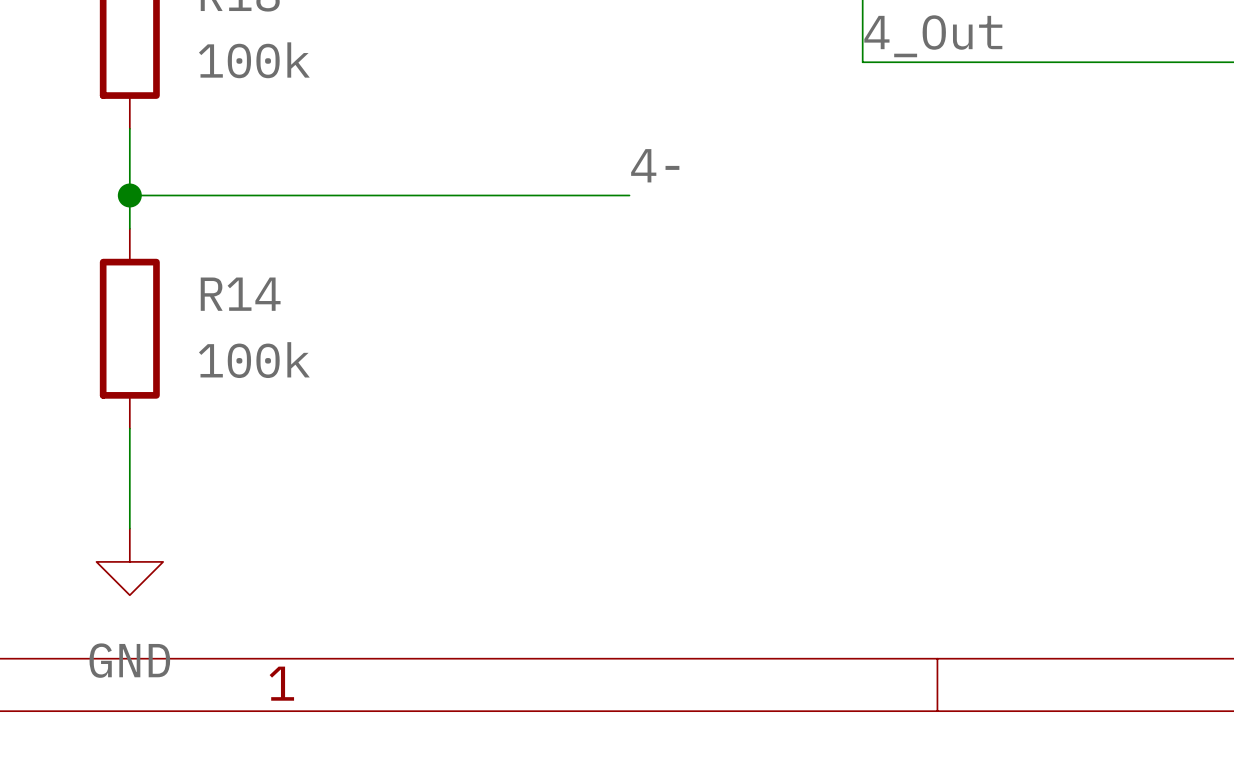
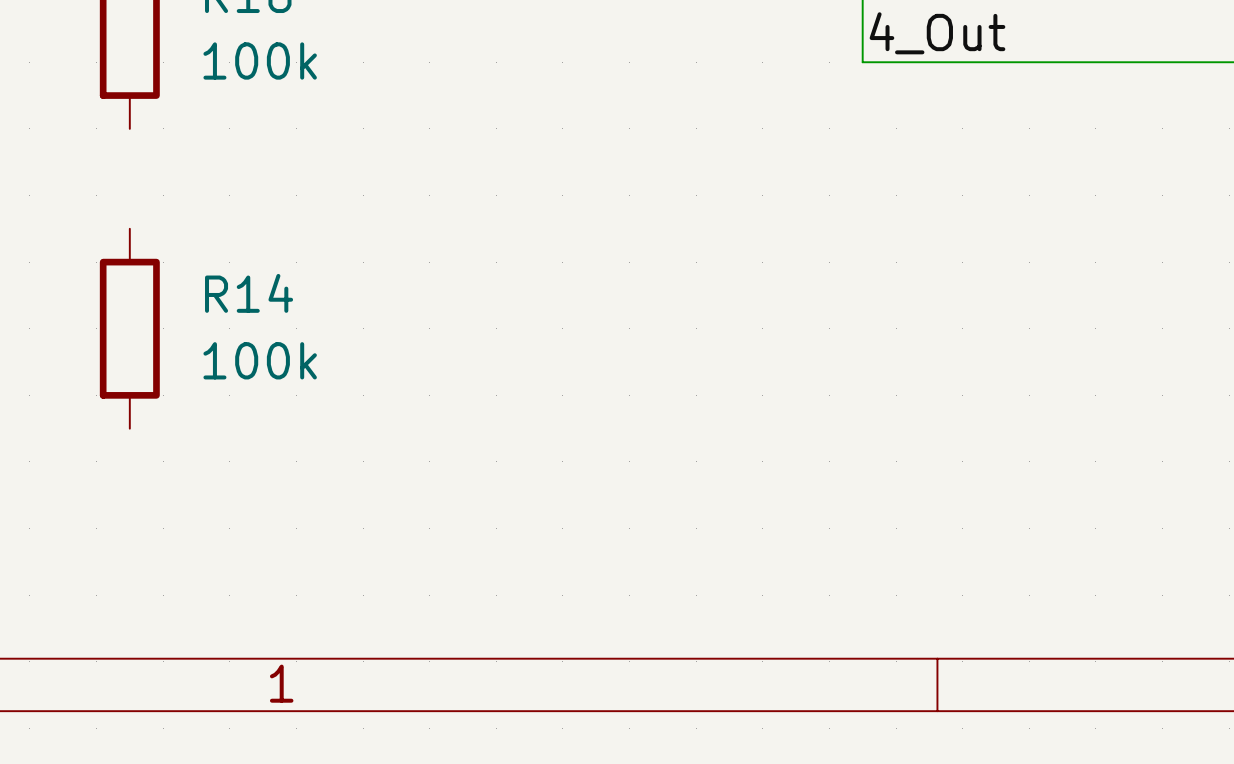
wire: (129, 128) (129, 228) -> none
label: 4- (655, 165) -> none
wire: (129, 195) (629, 195) -> none
junction: (129, 195) -> none
wire: (129, 428) (129, 528) -> none
power symbol: GND (129, 561) -> none

